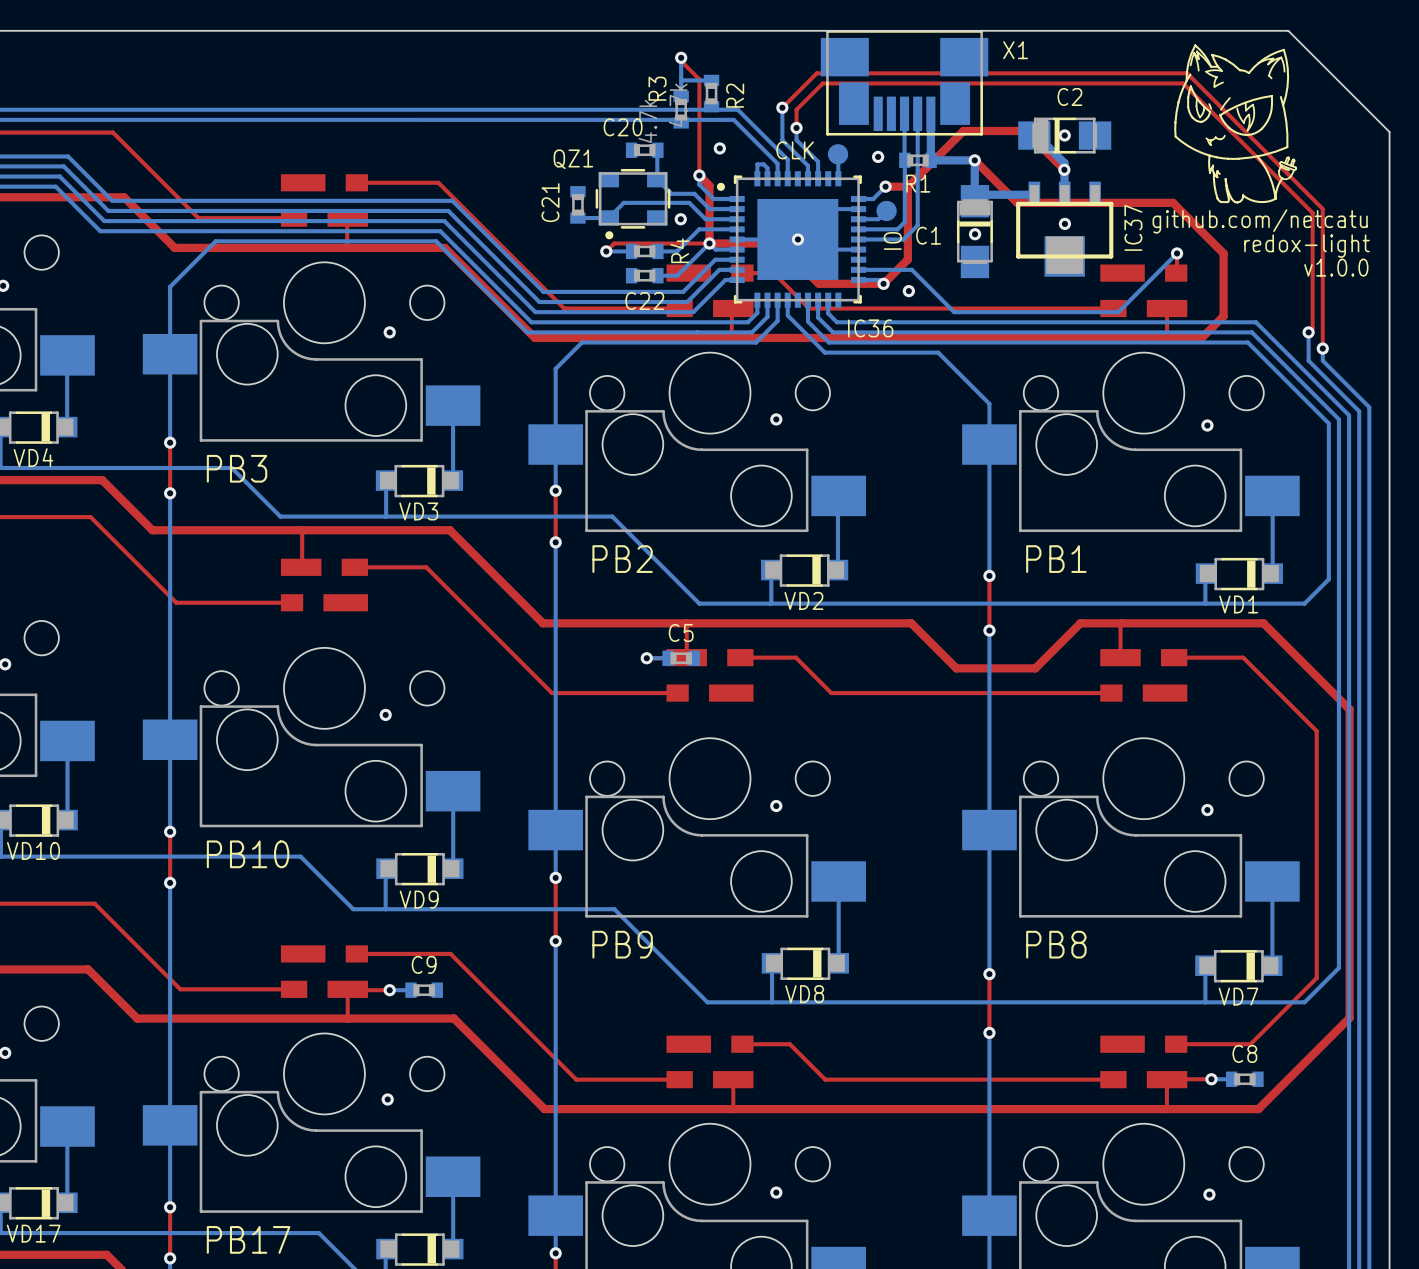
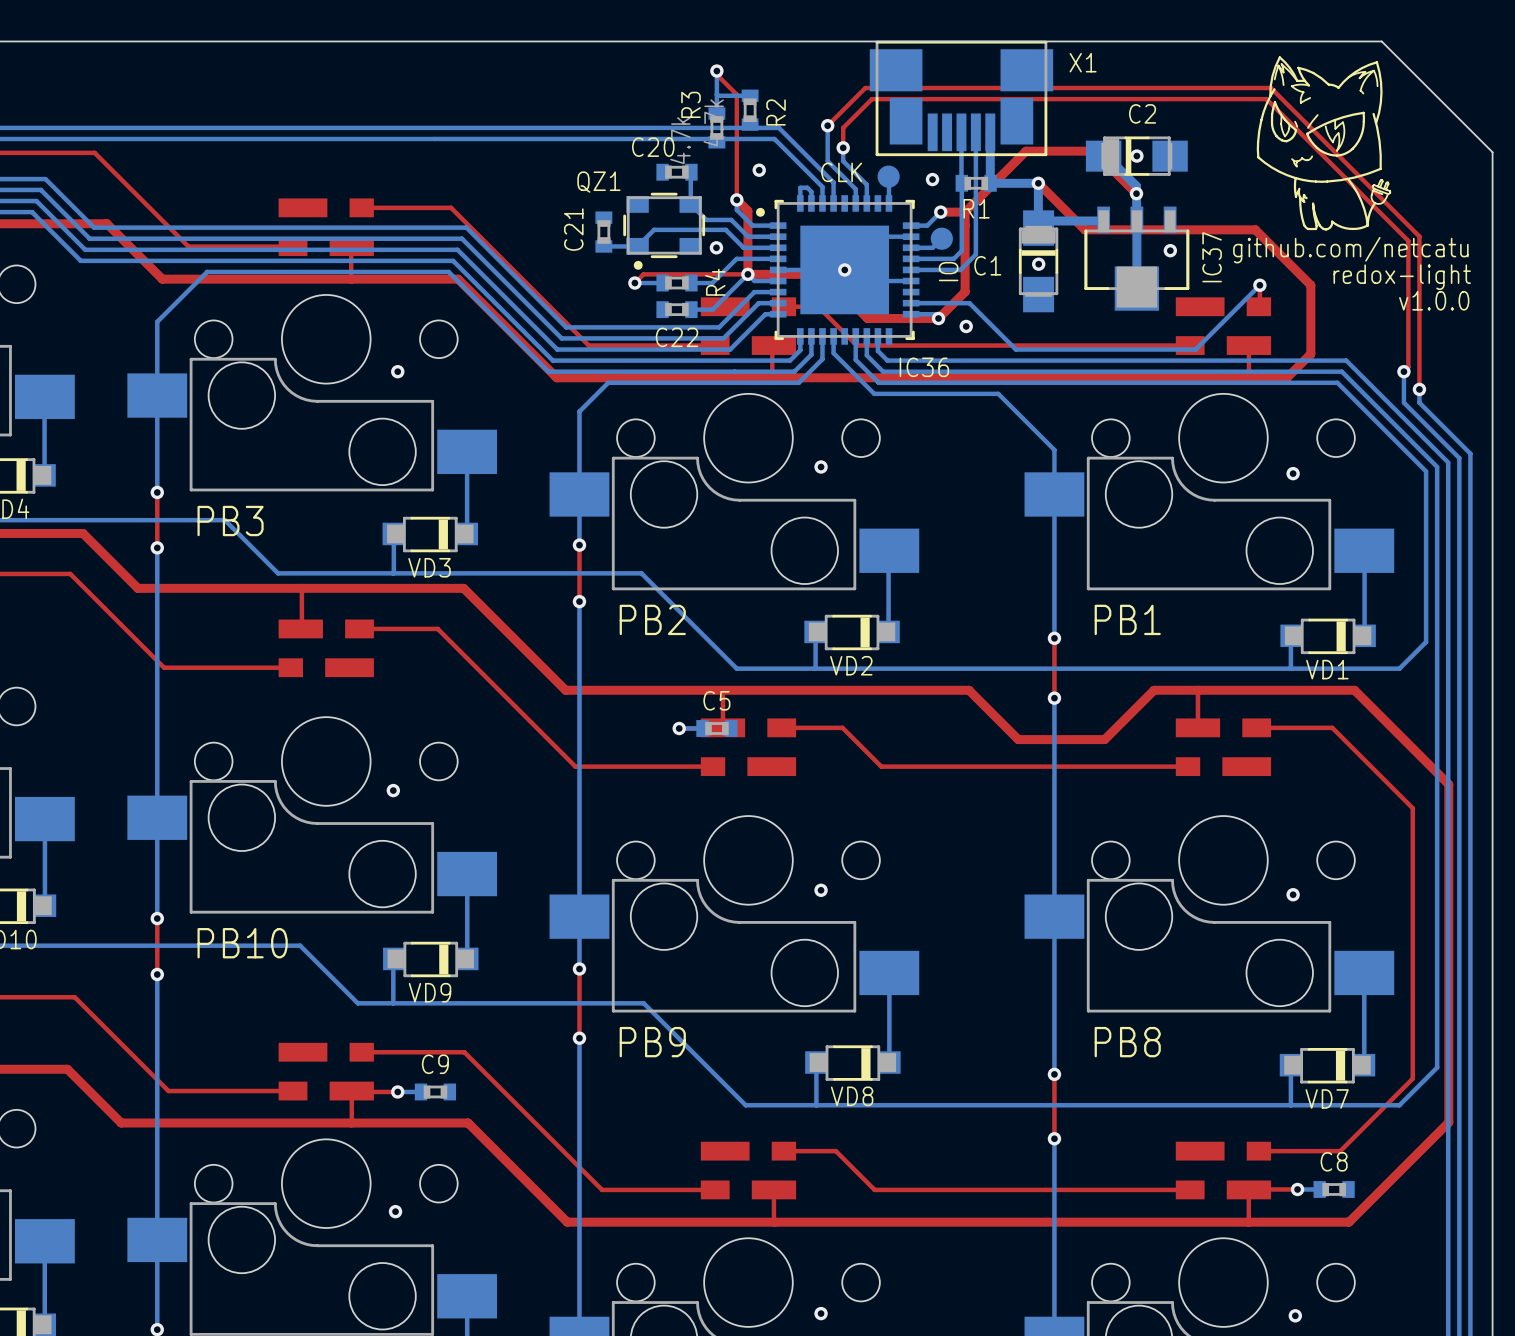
IC37 footprint: [1016, 181, 1114, 277] -> [1084, 206, 1190, 311]
bottom track: none -> (1136, 219) (1136, 288)
via position: (1064, 223) -> (1170, 250)

